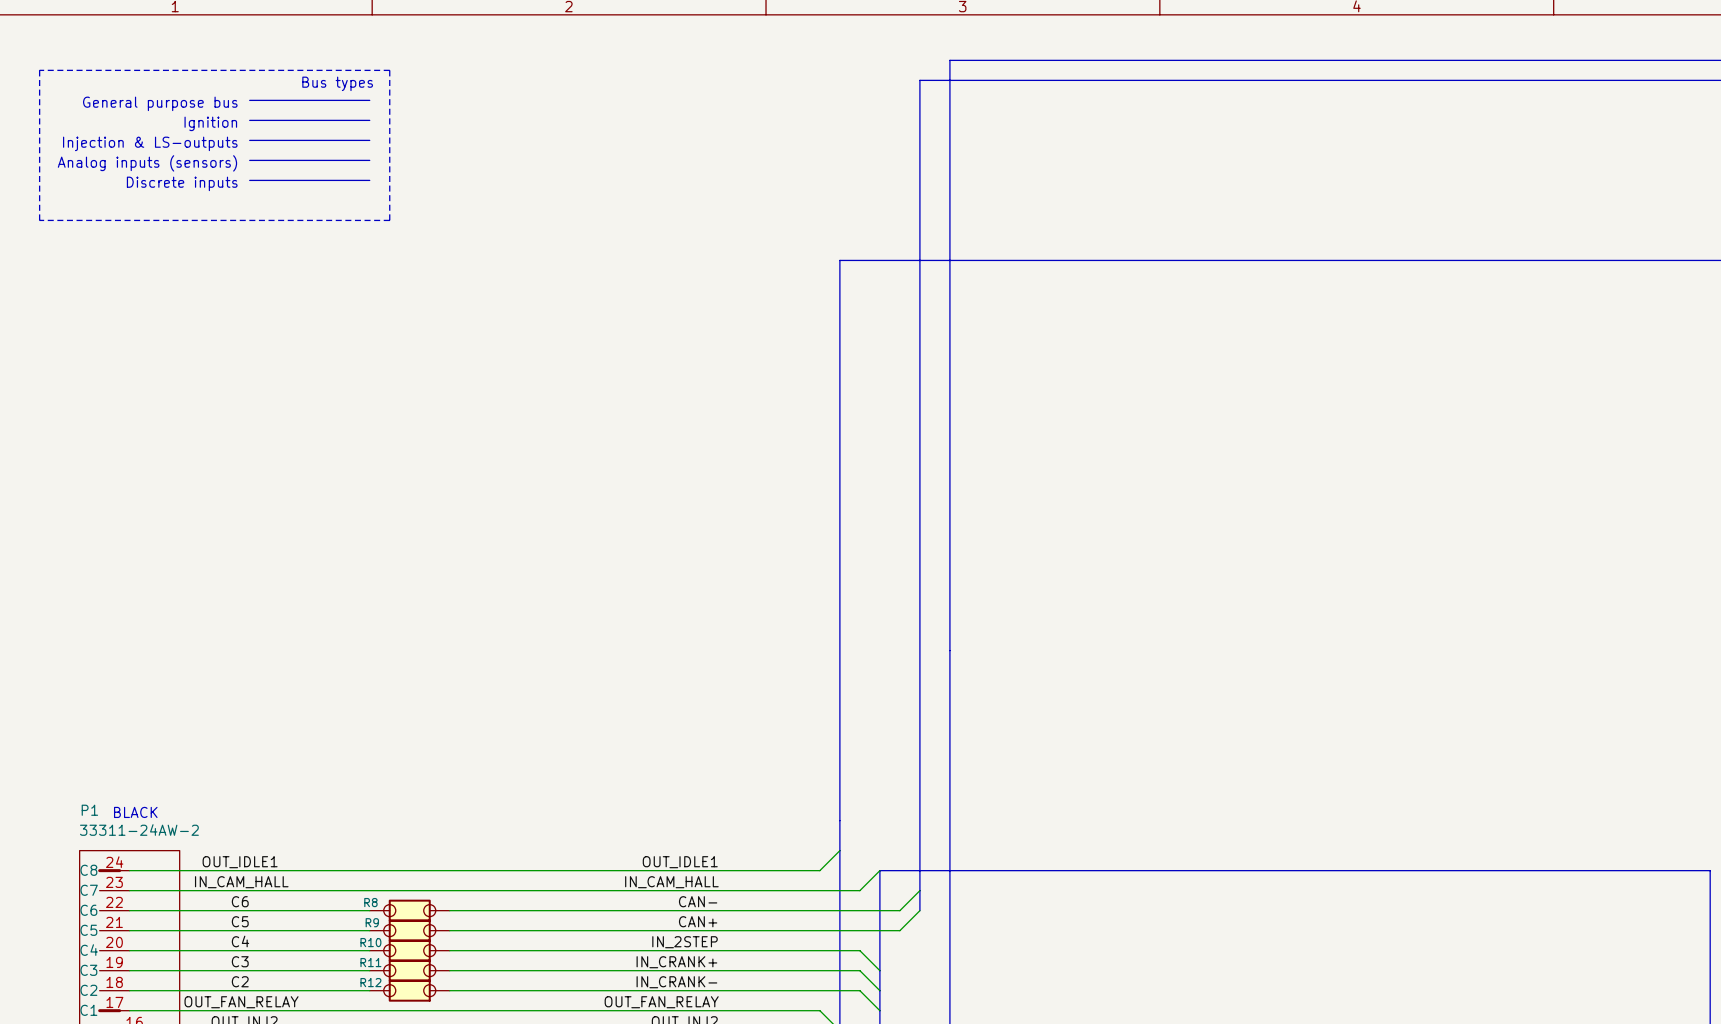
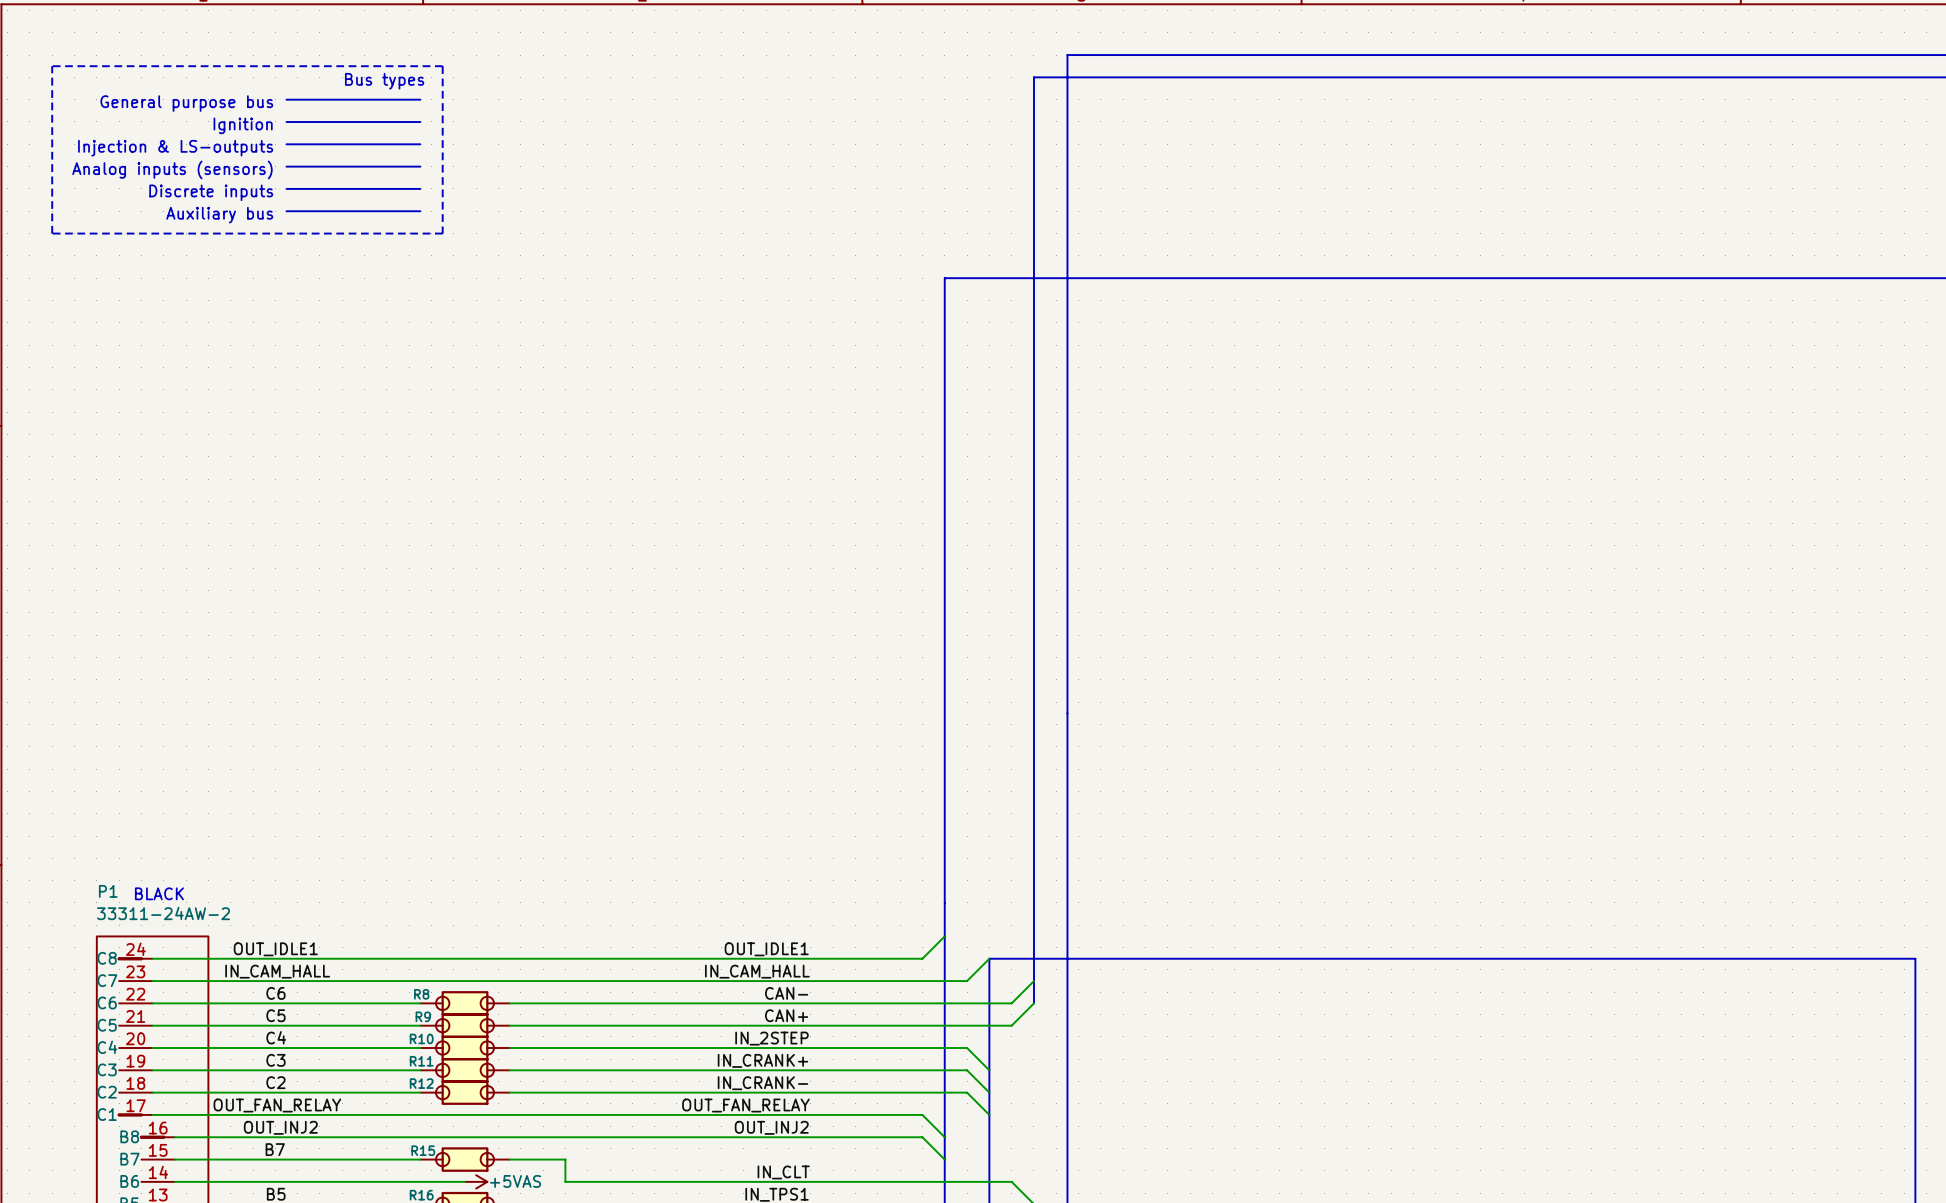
bus: none -> (286, 211) (420, 211)
text: none -> Auxiliary bus (219, 215)

